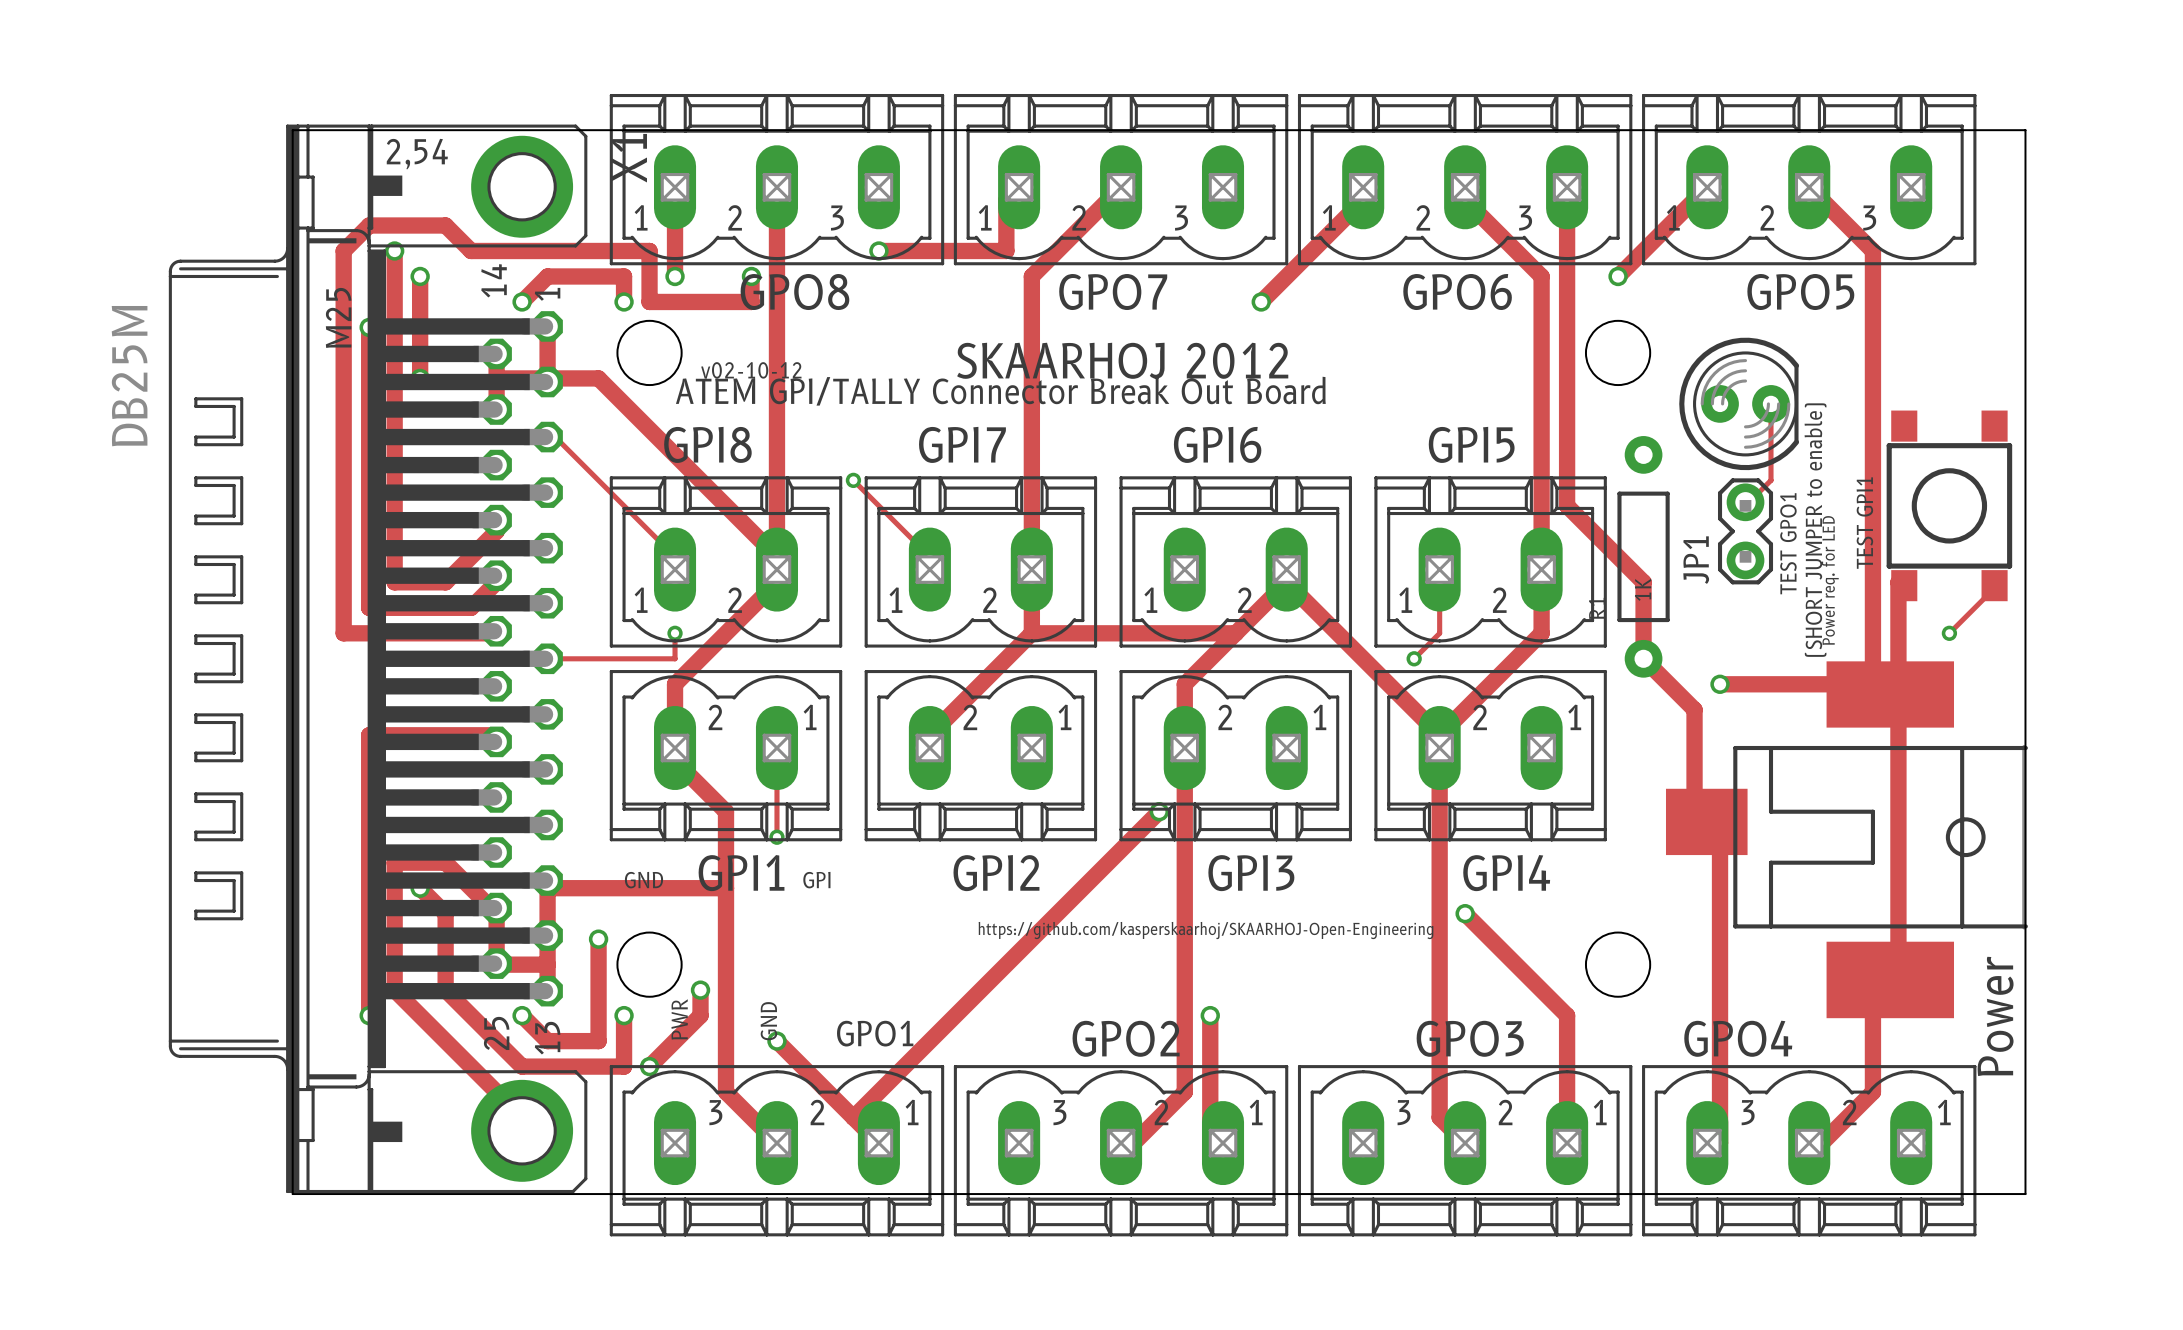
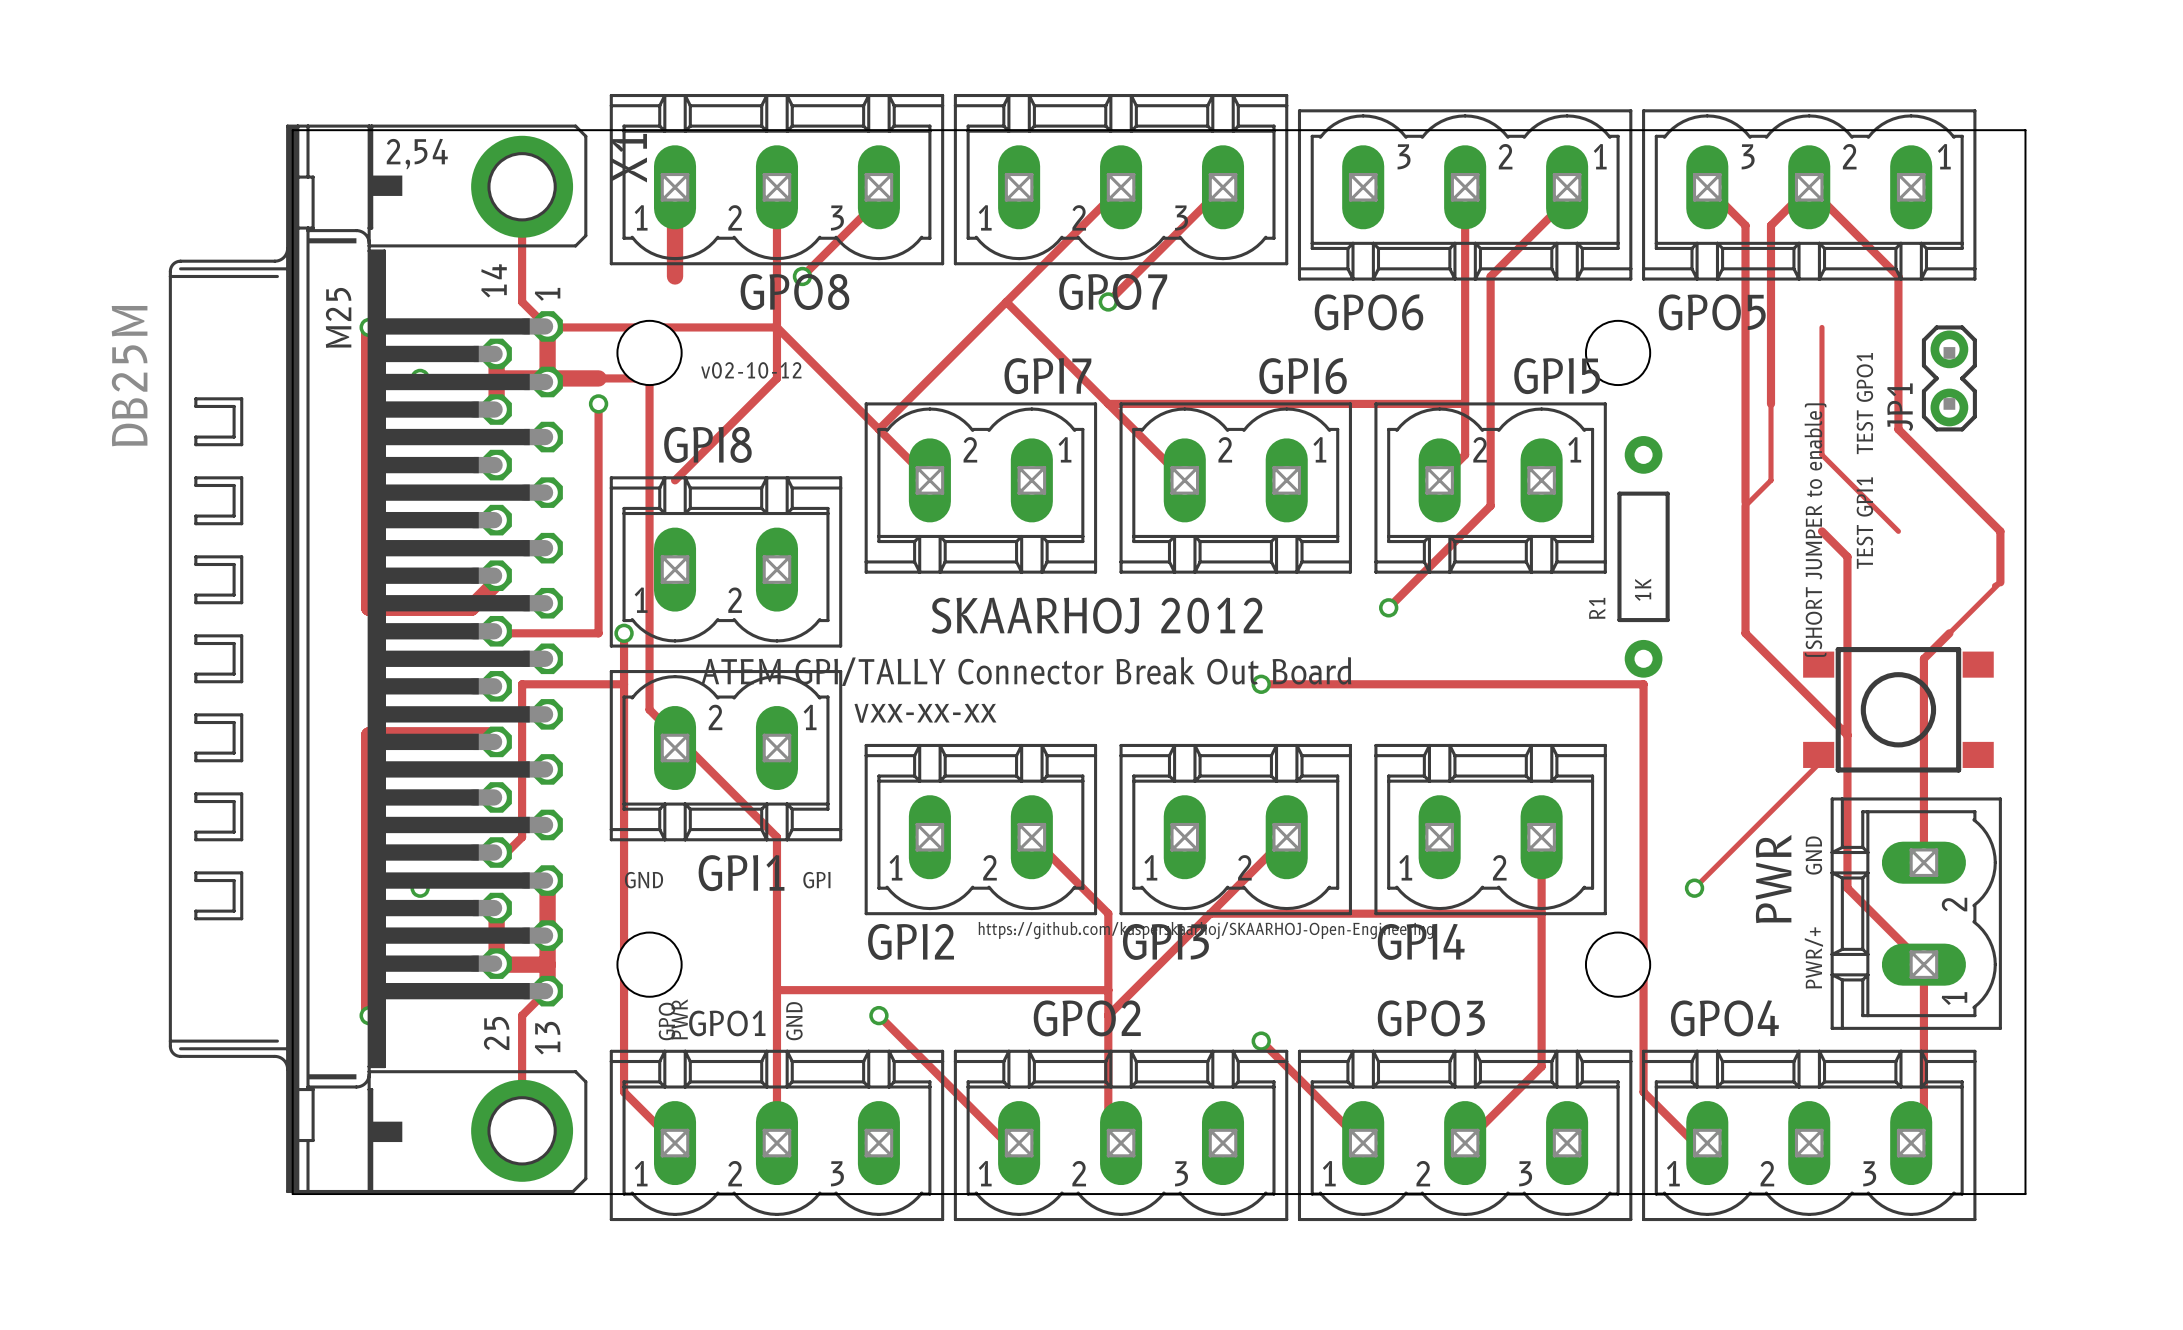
GPO6 footprint: [1297, 93, 1633, 266] -> [1297, 109, 1633, 281]
GPO5 footprint: [1642, 93, 1977, 266] -> [1642, 109, 1977, 281]
track: none -> (522, 186) (522, 301) (547, 327) (776, 327) (929, 480)
track width: thick (776, 187) (776, 378) -> thin (776, 187) (776, 378)
track: none -> (878, 187) (878, 200) (802, 276)
track: (1019, 187) (1006, 200) (1006, 250) (878, 250) -> none
track width: thick (1121, 187) (1031, 276) -> thin (1121, 187) (1031, 276)
track: none -> (1223, 187) (1108, 301)
track: (1363, 187) (1363, 200) (1261, 301) -> none
track: (1707, 187) (1618, 276) -> (1707, 187) (1745, 225) (1745, 502)
track: none -> (1809, 187) (1771, 225) (1771, 403)
track width: thick (1809, 187) (1872, 250) -> thin (1809, 187) (1872, 250)
track: (1465, 200) (1541, 276) (1541, 633) (1439, 735) -> (1465, 200) (1465, 454) (1439, 480)
track: (1567, 200) (1567, 505) (1643, 582) (1643, 658) (1694, 709) (1694, 811) (1720, 837) (1720, 1143) (1707, 1143) -> (1261, 684) (1643, 684) (1643, 1092) (1694, 1143) (1707, 1143)
track: none -> (1567, 200) (1490, 276) (1490, 505) (1388, 607)
track: (394, 250) (394, 582) (445, 582) (496, 531) (496, 520) -> none
via: (394, 250) -> none
via: (878, 250) -> none
track: (1872, 250) (1872, 684) -> (1872, 250) (1898, 276) (1898, 429) (2000, 531) (2000, 582)
track: (420, 276) (420, 378) -> none
via: (420, 276) -> none
via: (675, 276) -> none
track: (751, 276) (751, 301) (649, 301) (649, 250) (471, 250) (445, 225) (369, 225) (343, 250) (343, 633) (496, 633) -> (598, 403) (598, 633) (496, 633)
via: (751, 276) -> none
via: none -> (802, 276)
track: (1031, 276) (1031, 633) -> (1031, 276) (878, 429)
via: (1618, 276) -> none
GPO6 name position: GPO6 (1457, 292) -> GPO6 (1368, 312)
GPO5 name position: GPO5 (1800, 292) -> GPO5 (1712, 312)
track: (522, 301) (547, 276) (624, 276) (624, 301) -> none
via: (522, 301) -> none
via: (624, 301) -> none
via: none -> (1108, 301)
via: (1261, 301) -> none
track: none -> (1821, 327) (1821, 454) (1898, 531)
text position: SKAARHOJ 2012 (1122, 360) -> SKAARHOJ 2012 (1097, 615)
track: (598, 378) (776, 556) -> (1006, 301) (1184, 480)
track: (776, 378) (776, 582) (675, 684) (675, 760) (726, 811) (726, 1092) (776, 1143) -> (598, 378) (649, 378) (649, 709) (776, 837) (776, 1143)
track: none -> (776, 378) (675, 480)
text position: ATEM GPI/TALLY Connector Break Out Board (1000, 391) -> ATEM GPI/TALLY Connector Break Out Board (1026, 671)
via: none -> (598, 403)
track: none -> (1108, 403) (1465, 403)
part: (1739, 403) -> none
track: (547, 437) (547, 429) (675, 556) (675, 569) -> none
GPI7 footprint: [864, 476, 1098, 648] -> [864, 402, 1098, 574]
GPI6 footprint: [1119, 476, 1352, 648] -> [1119, 402, 1352, 574]
GPI5 footprint: [1374, 476, 1607, 648] -> [1374, 402, 1607, 574]
track: (853, 480) (929, 556) (929, 569) -> none
via: (853, 480) -> none
track: none -> (1745, 505) (1745, 633) (1847, 735)
part rotation: 0° (1949, 505) -> 90° clockwise (1898, 709)
part position: (1949, 505) -> (1898, 709)
JP1 position: (1745, 531) -> (1949, 378)
track: none -> (1821, 531) (1847, 556) (1847, 888) (1923, 964) (1923, 1143) (1911, 1143)
text position: TEST GPO1 (1788, 543) -> TEST GPO1 (1864, 403)
track: (1439, 569) (1439, 633) (1414, 658) -> none
text: Power req. for LED (1830, 580) -> none
track: (1286, 582) (1184, 684) (1184, 1092) (1133, 1143) (1121, 1143) -> (1031, 837) (1108, 913) (1108, 1143) (1121, 1143)
track: (1286, 582) (1439, 735) -> none
track: (1904, 585) (1898, 582) (1898, 684) (1890, 694) -> none
via: none -> (1388, 607)
track: none -> (624, 633) (624, 1015)
via: none -> (624, 633)
track: (675, 633) (675, 658) (547, 658) -> none
via: (675, 633) -> none
track: (1031, 633) (1235, 633) -> none
track: (1031, 633) (929, 735) (929, 748) -> none
track: none -> (1949, 633) (1923, 658) (1923, 862)
via: (1949, 633) -> none
via: (1414, 658) -> none
GPI2 footprint: [864, 670, 1098, 842] -> [864, 743, 1098, 916]
GPI3 footprint: [1119, 670, 1352, 842] -> [1119, 743, 1352, 916]
GPI4 footprint: [1374, 670, 1607, 842] -> [1374, 743, 1607, 916]
track: none -> (624, 684) (522, 684) (522, 837) (496, 862) (496, 852)
via: none -> (1261, 684)
track: (1720, 684) (1872, 684) -> none
via: (1720, 684) -> none
track: (1890, 694) (1898, 709) (1898, 964) (1890, 979) (1872, 990) (1872, 1092) (1821, 1143) (1809, 1143) -> none
text: none -> vxx-xx-xx (925, 713)
track: (1439, 735) (1439, 1117) (1465, 1143) -> (1541, 837) (1541, 1066) (1465, 1143)
track: (776, 748) (776, 837) -> none
track: none -> (1818, 754) (1821, 760) (1694, 888)
track: (1159, 811) (853, 1117) -> none
via: (1159, 811) -> none
via: (776, 837) -> none
track: none -> (1286, 837) (1108, 1015)
part: (1846, 839) -> none
text: none -> GND (1813, 855)
track: (420, 888) (445, 913) (445, 990) (522, 1066) (624, 1066) -> (675, 1143) (624, 1092) (624, 1066)
track: (547, 888) (726, 888) -> none
via: none -> (1694, 888)
track: (496, 913) (445, 862) (394, 862) (394, 990) (522, 1117) -> (547, 990) (522, 1015) (522, 1117)
track: none -> (1210, 913) (1541, 913)
track: (1465, 913) (1567, 1015) (1567, 1143) -> none
via: (1465, 913) -> none
PWR: none -> (1916, 913)
track: (598, 939) (598, 1041) (547, 1041) (522, 1015) -> none
via: (598, 939) -> none
text: none -> PWR/+ (1813, 958)
track: (700, 990) (700, 1015) (649, 1066) -> none
via: (700, 990) -> none
track: none -> (776, 990) (1108, 990)
via: (522, 1015) -> none
track width: thick (624, 1015) (624, 1066) -> thin (624, 1015) (624, 1066)
via: (624, 1015) -> none
track: none -> (878, 1015) (1006, 1143) (1019, 1143)
via: none -> (878, 1015)
track: (1210, 1015) (1210, 1143) (1223, 1143) -> none
via position: (1210, 1015) -> (1261, 1041)
text: Power (1995, 1016) -> none
text: none -> GPO (666, 1021)
text position: GND (768, 1021) -> GND (794, 1021)
GPO1 name position: GPO1 (875, 1033) -> GPO1 (727, 1023)
track: (776, 1041) (878, 1143) -> (1261, 1041) (1363, 1143)
via: (776, 1041) -> none
GPO1 footprint: [609, 1065, 945, 1237] -> [609, 1049, 945, 1222]
GPO2 footprint: [953, 1065, 1289, 1237] -> [953, 1049, 1289, 1222]
GPO3 footprint: [1297, 1065, 1633, 1237] -> [1297, 1049, 1633, 1222]
GPO4 footprint: [1642, 1065, 1977, 1237] -> [1642, 1049, 1977, 1222]
via: (649, 1066) -> none

